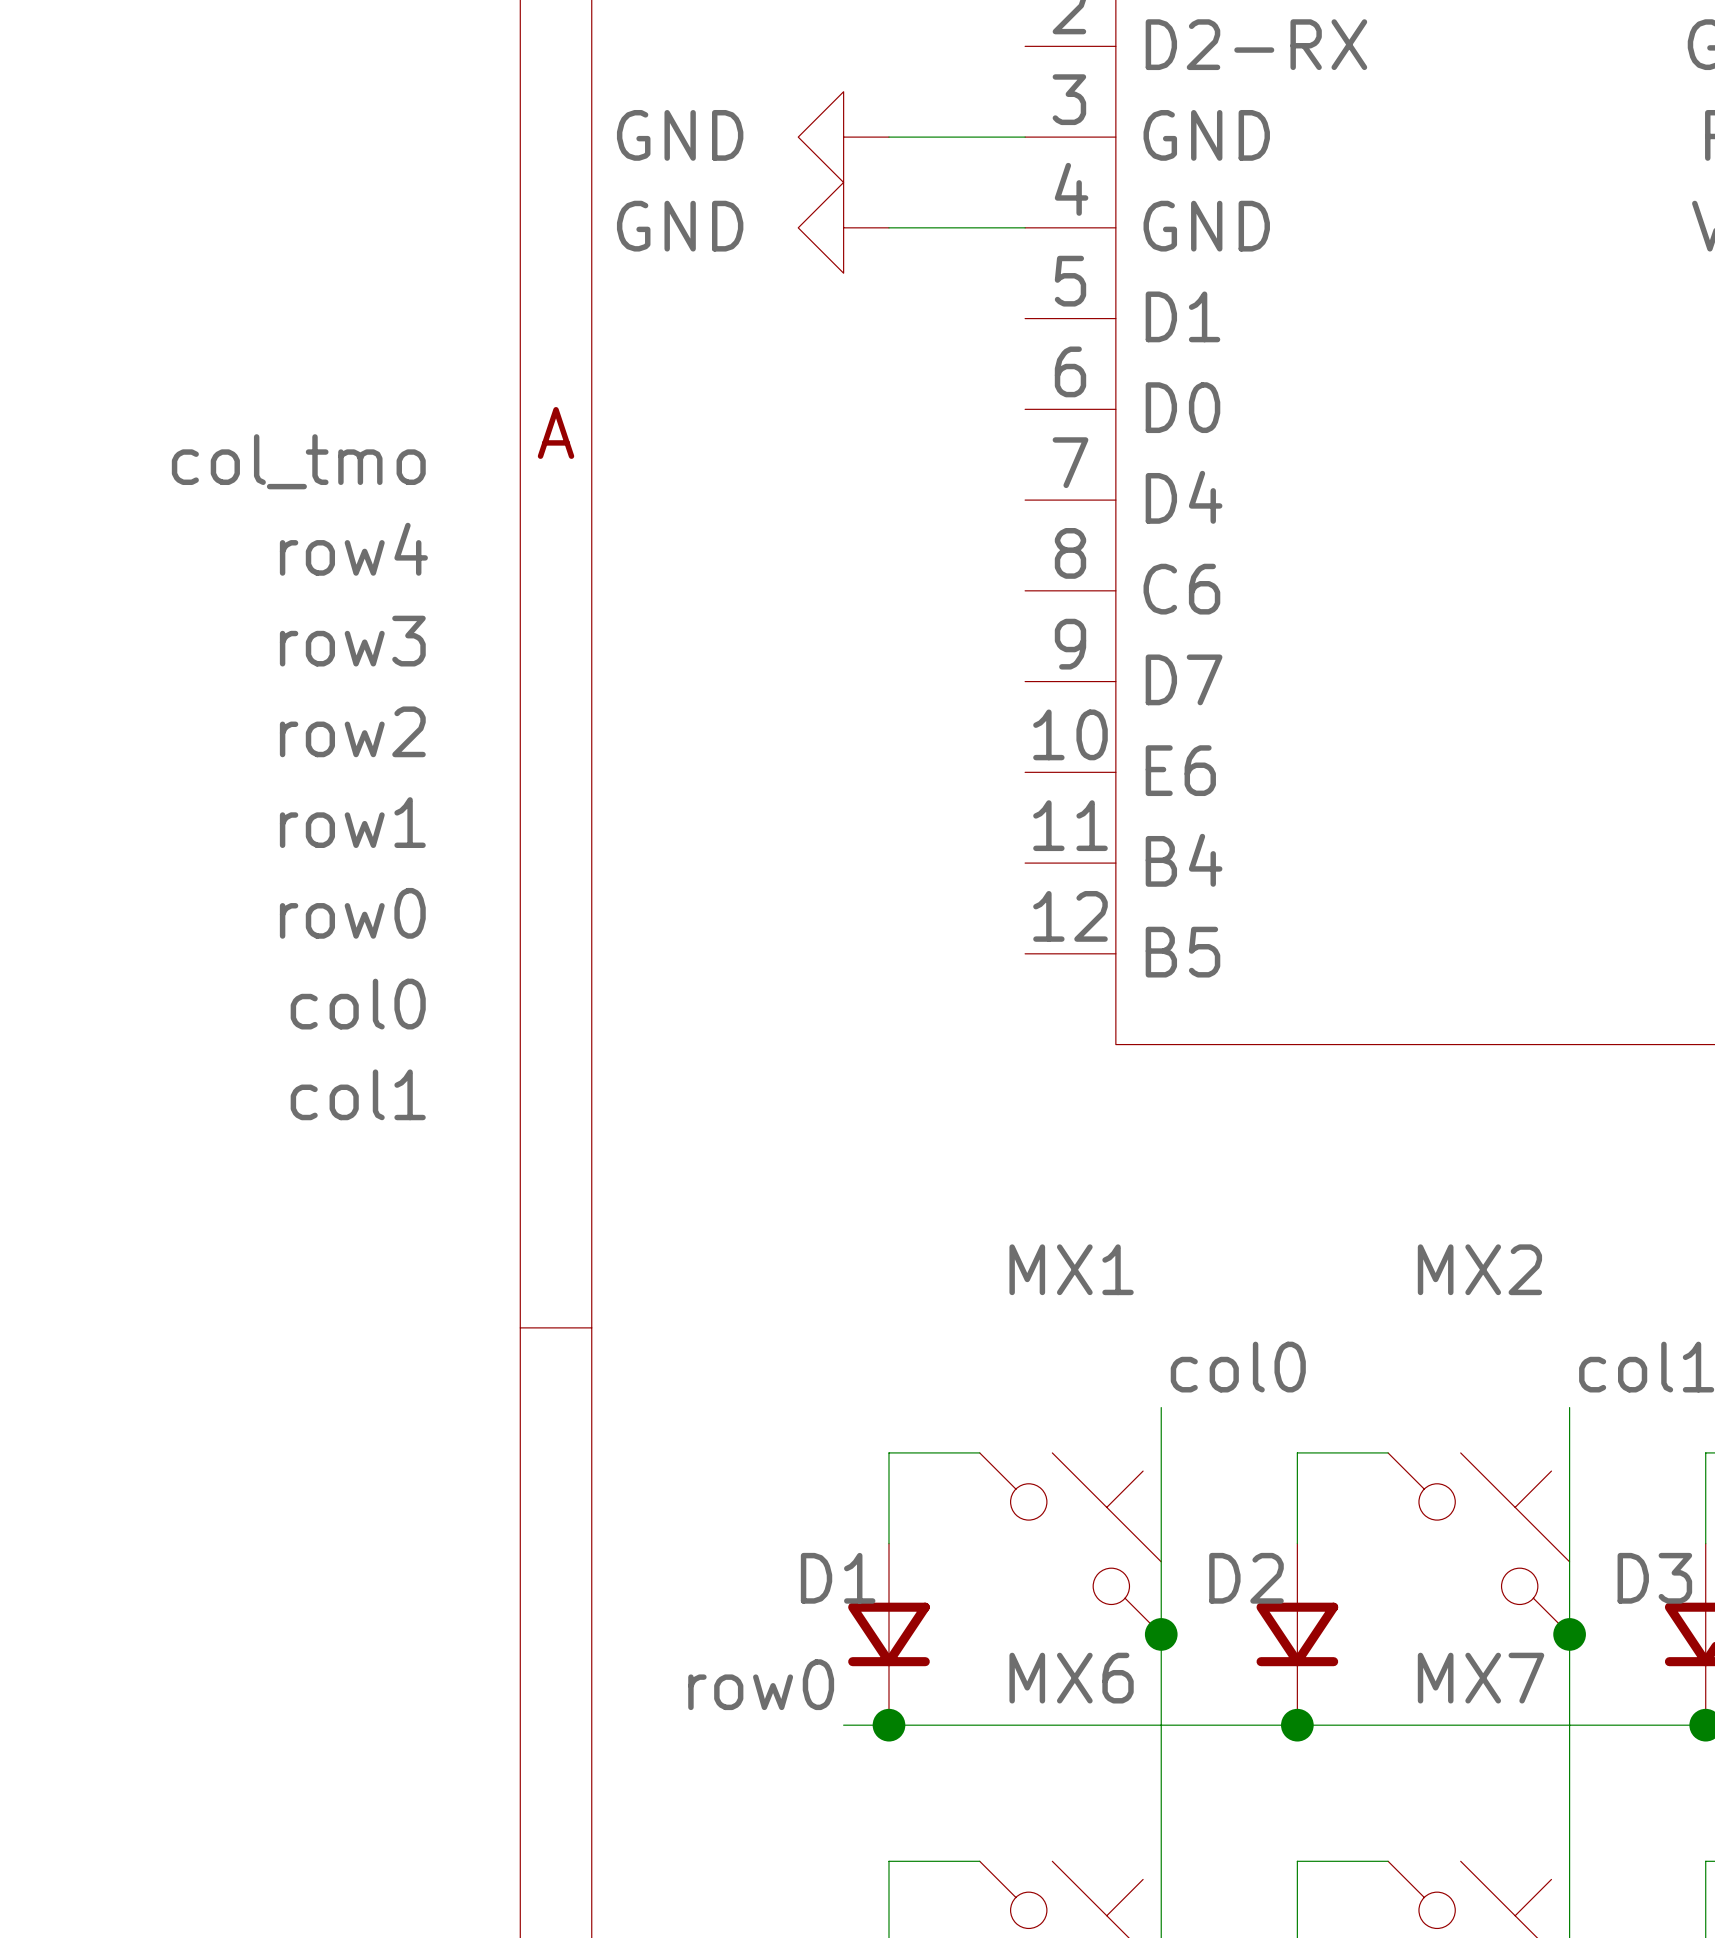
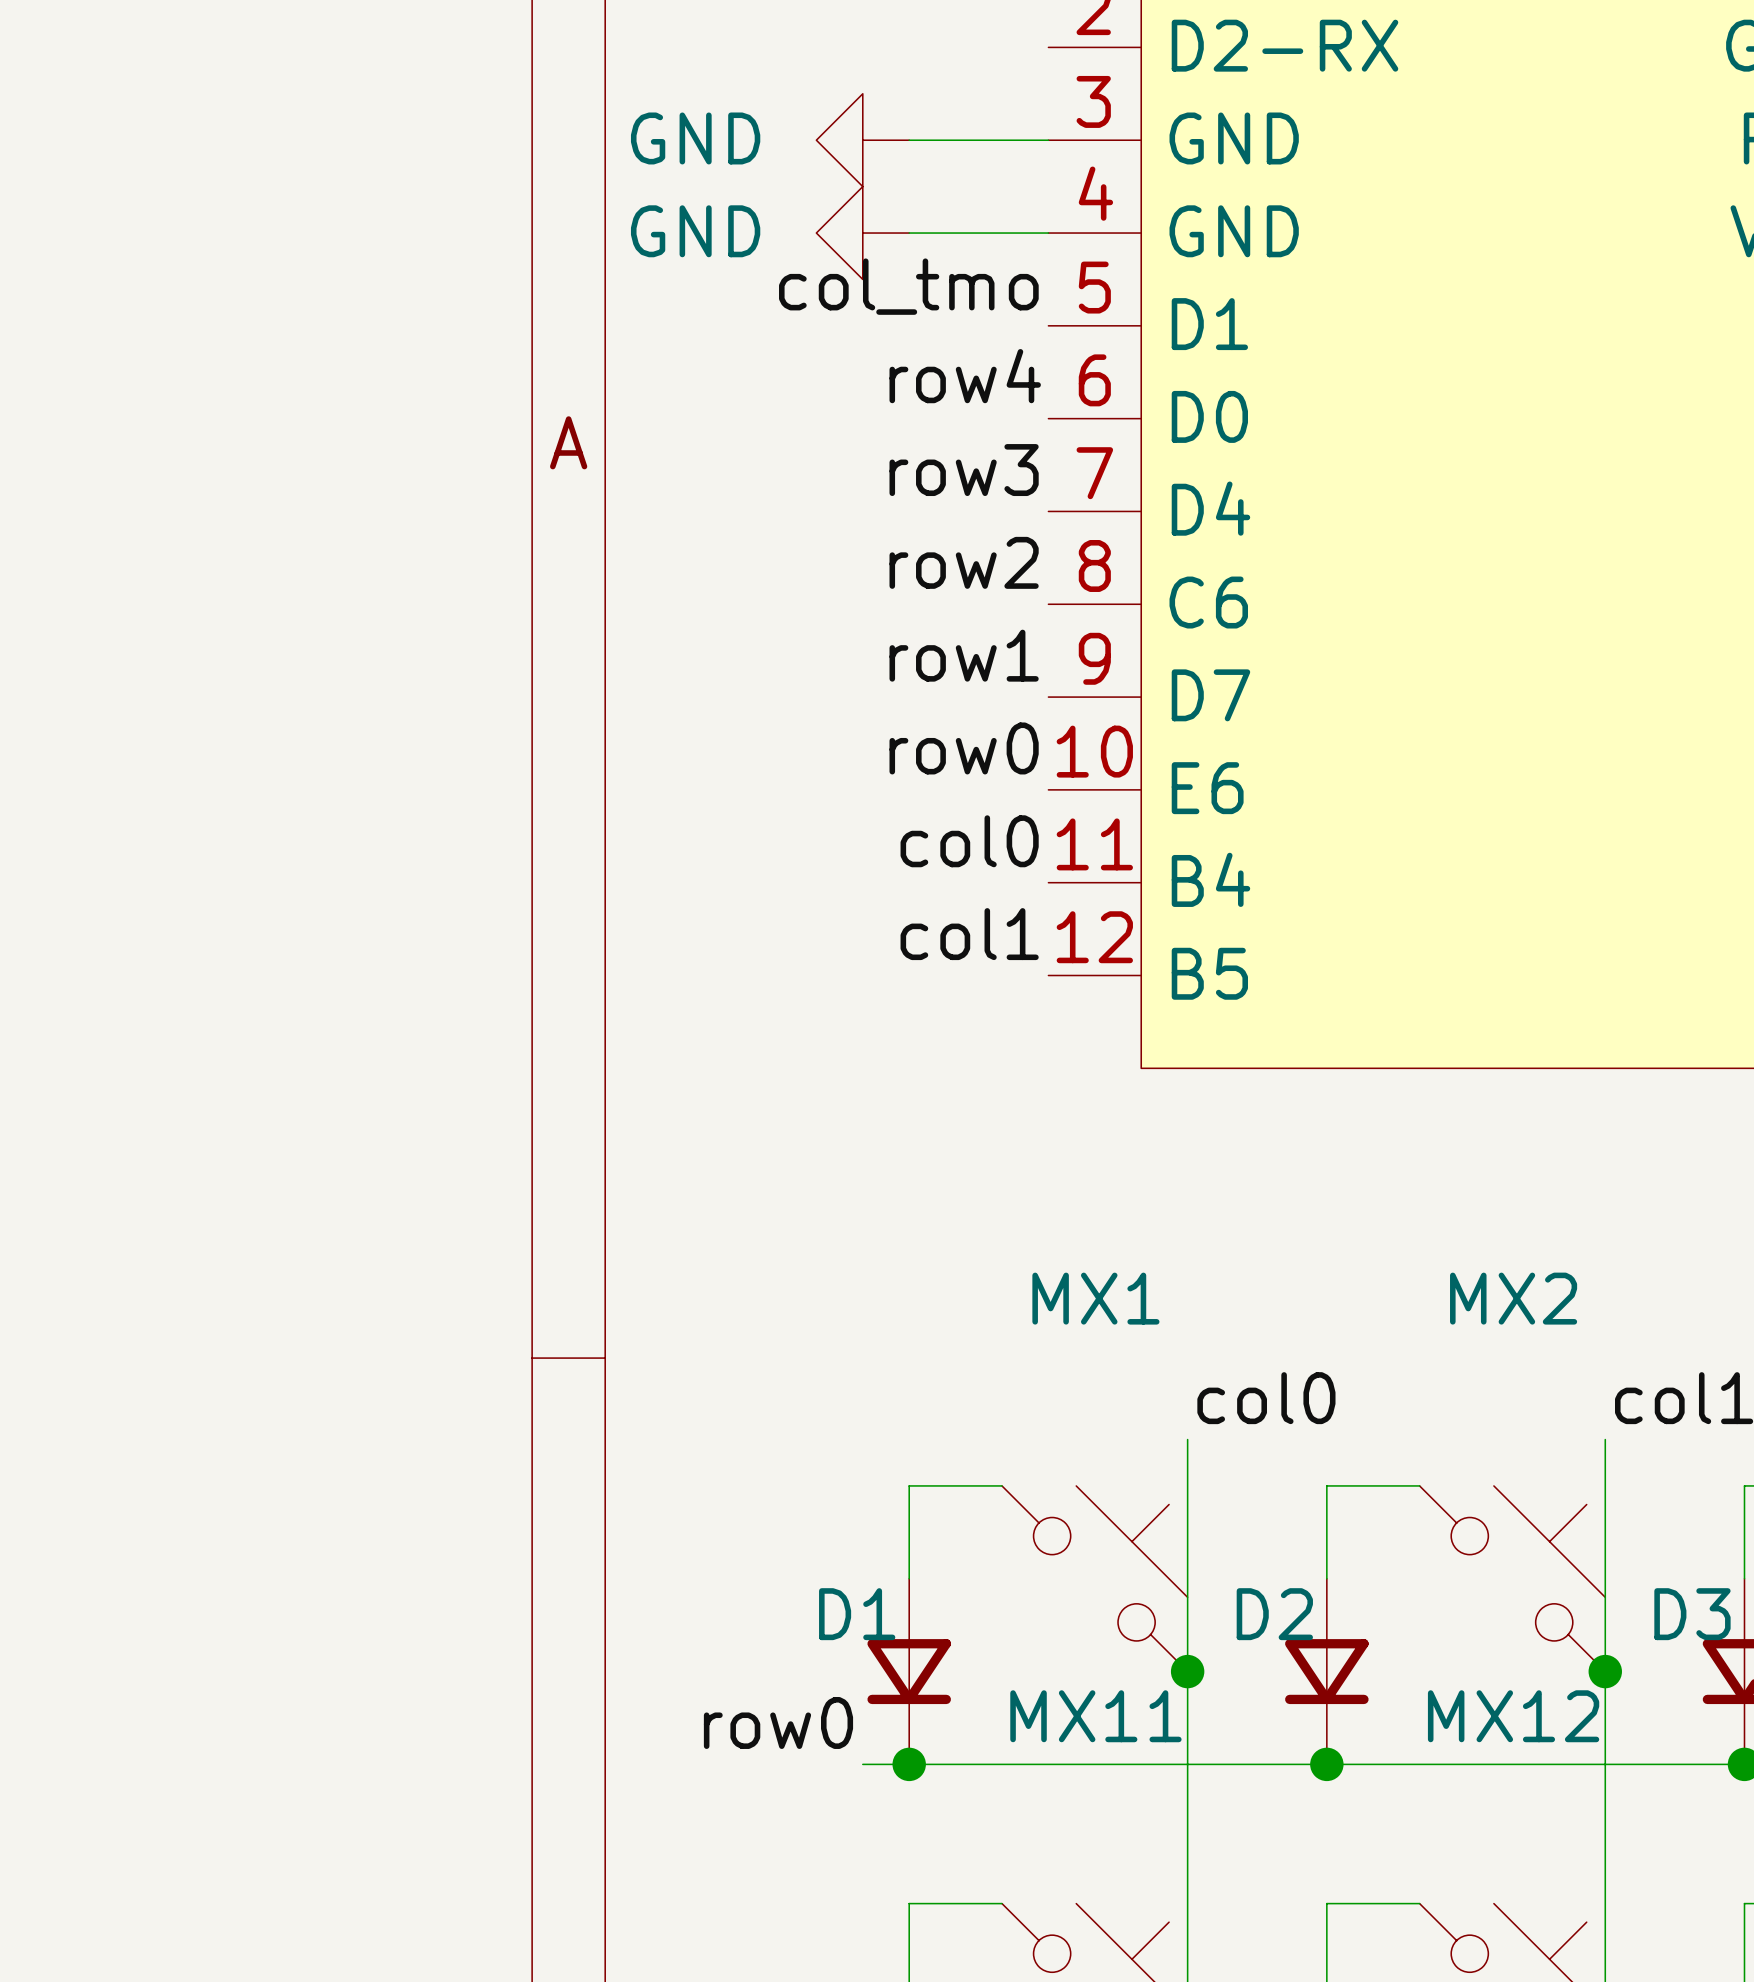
label position: col_tmo (298, 461) -> col_tmo (908, 286)
label position: row4 (353, 549) -> row4 (965, 376)
label position: row3 (352, 641) -> row3 (964, 470)
label position: row2 (352, 731) -> row2 (964, 562)
label position: row1 (352, 822) -> row1 (964, 655)
label position: row0 (352, 913) -> row0 (964, 748)
label position: col0 (358, 1004) -> col0 (969, 841)
label position: col1 (358, 1094) -> col1 (969, 934)
MX6 name: MX6 (1071, 1678) -> MX11 (1095, 1716)
MX7 name: MX7 (1481, 1678) -> MX12 (1513, 1716)

